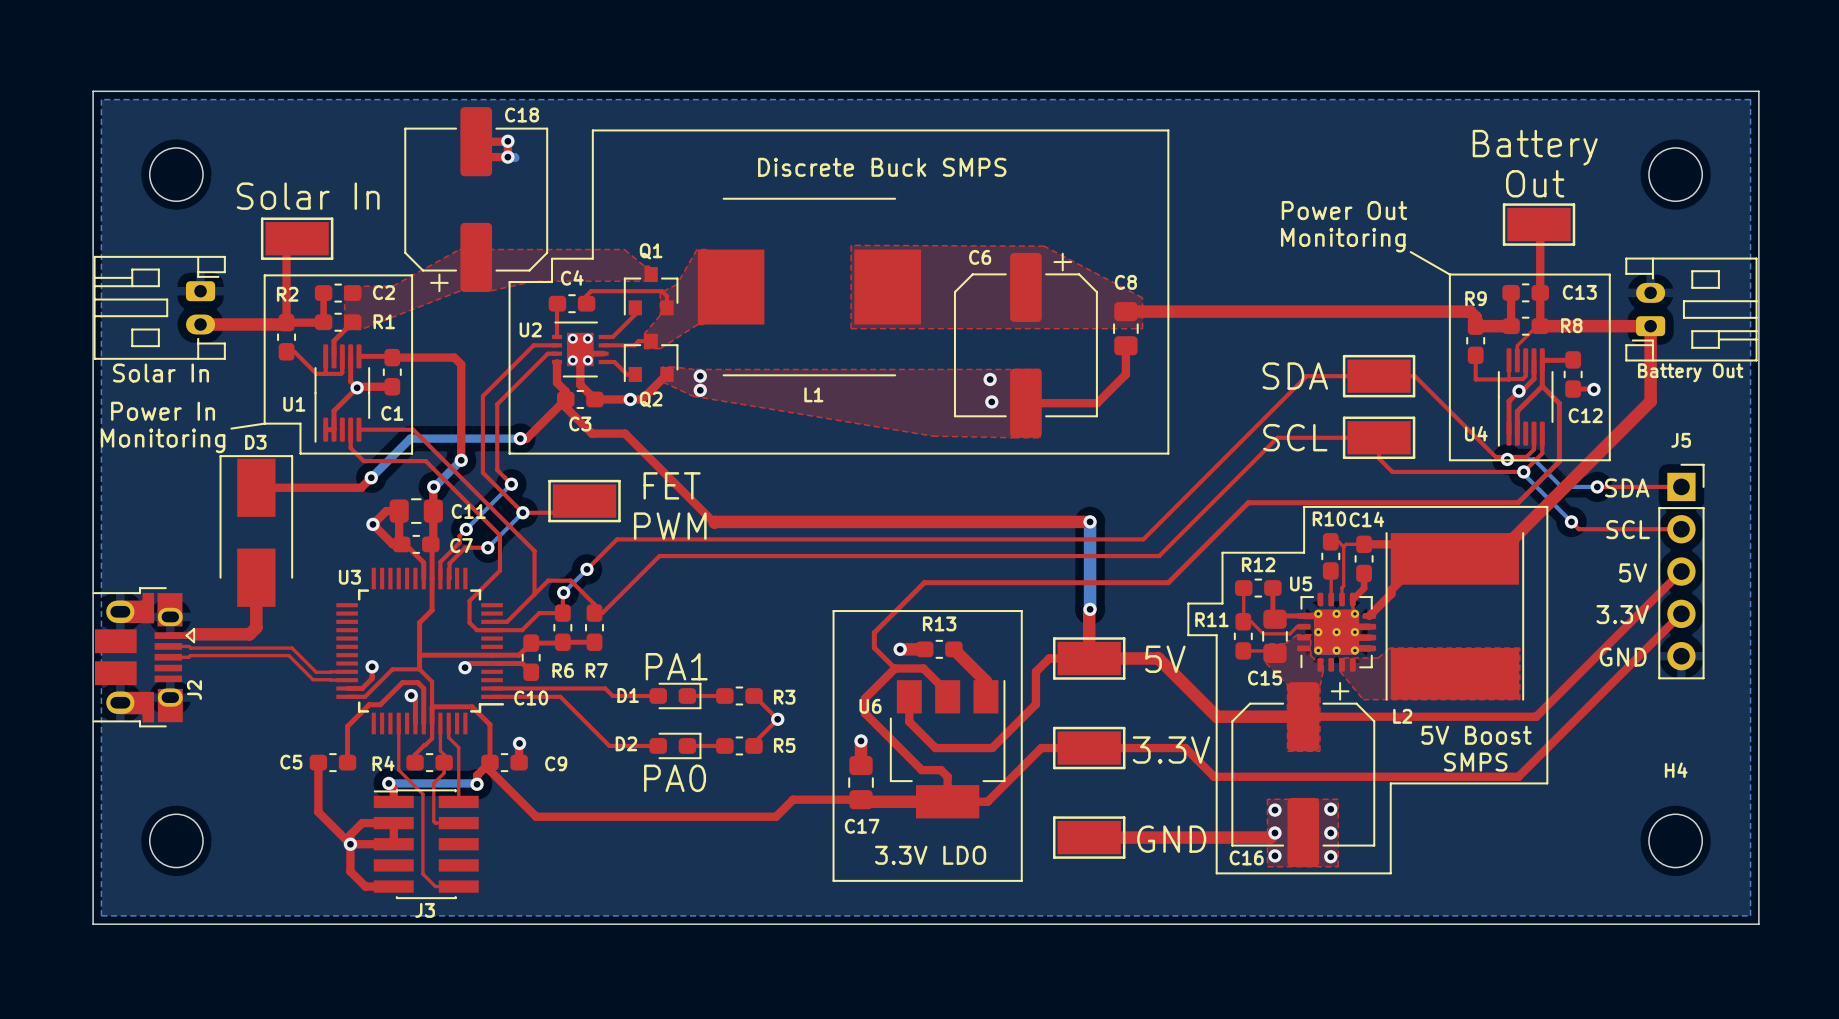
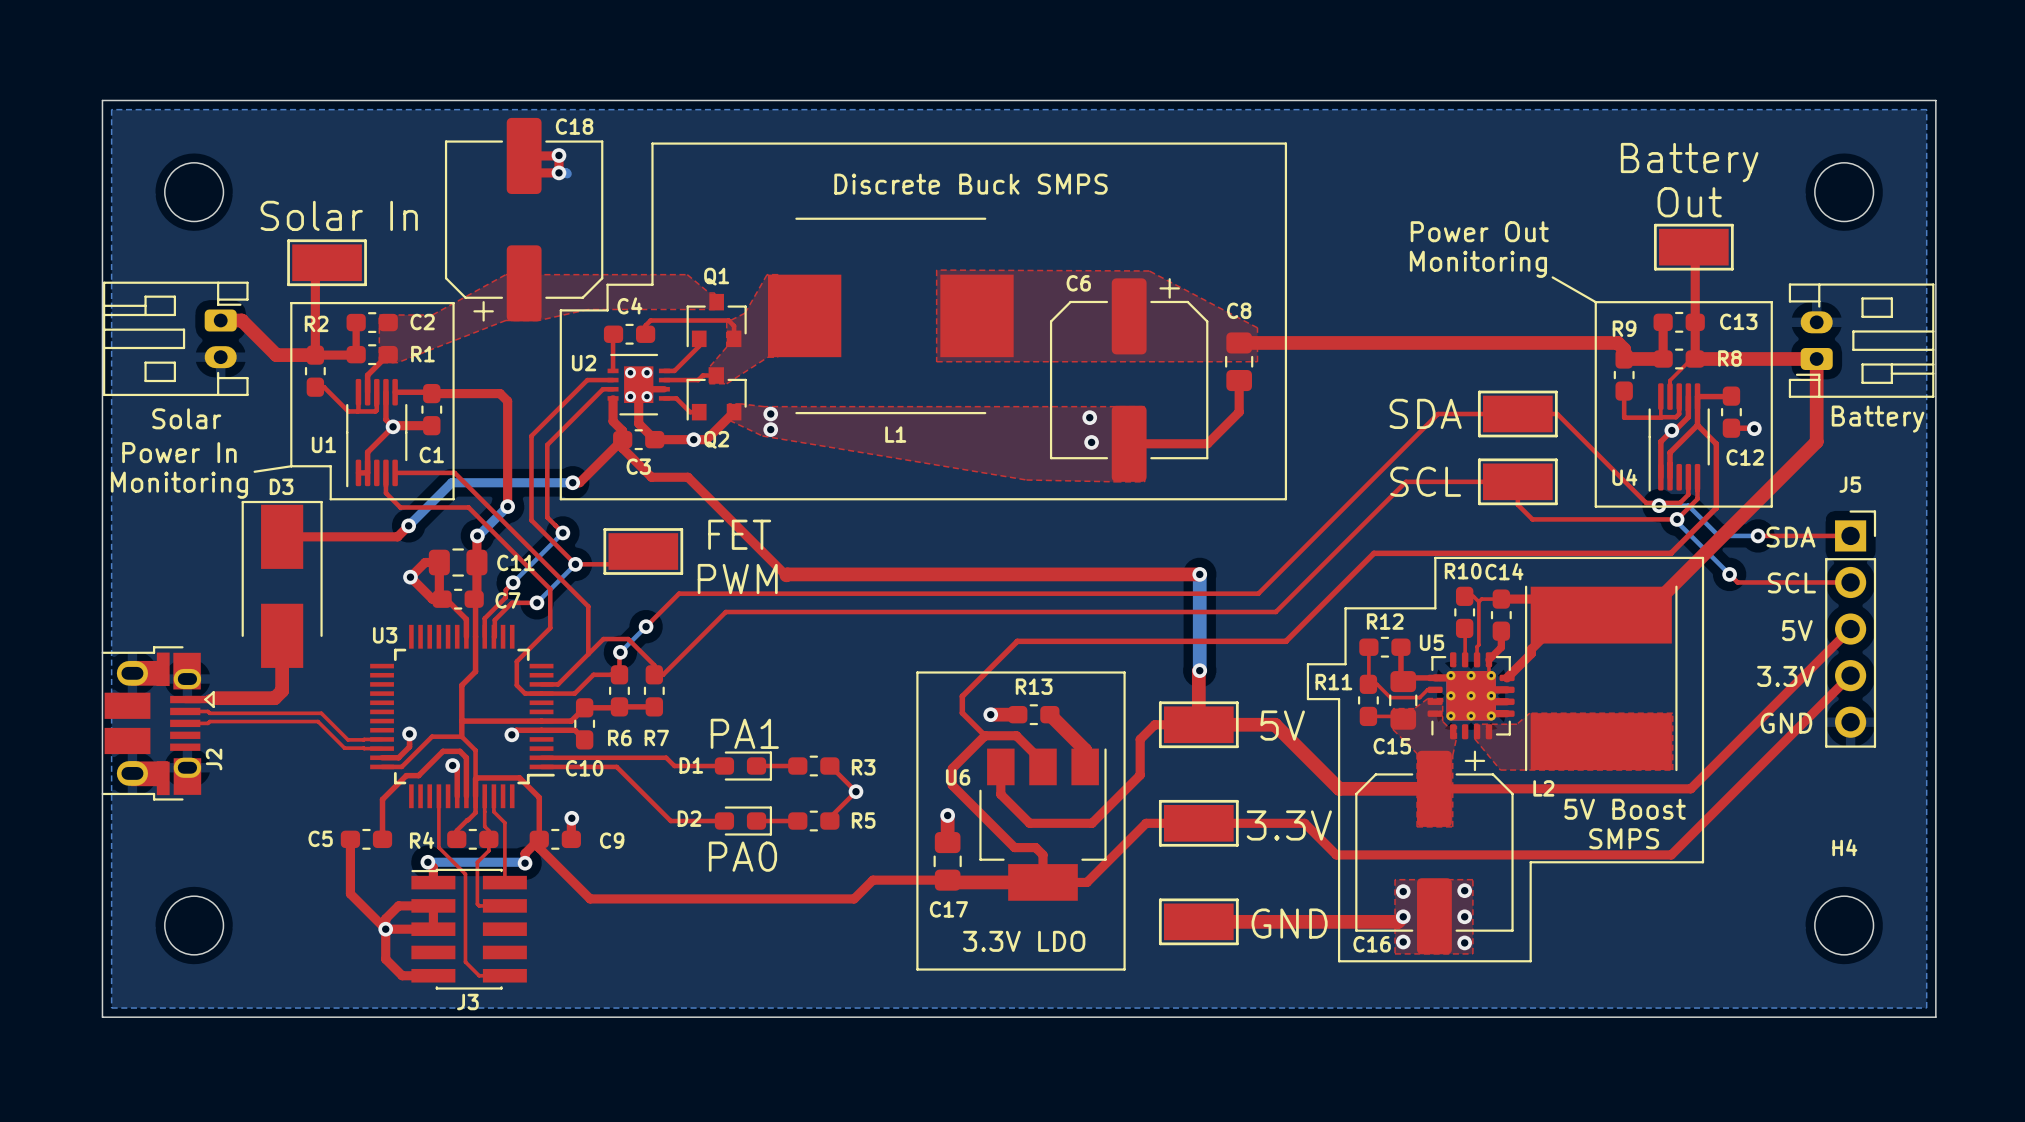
top track: none -> (220, 320) (241, 320) (276, 355) (315, 355)
top track: (200, 324) (284, 324) -> none
Battery Out name: Battery Out (1690, 372) -> none
Solar In name: Solar In (160, 373) -> none
text: none -> Solar (186, 418)
text: none -> Battery (1878, 419)

